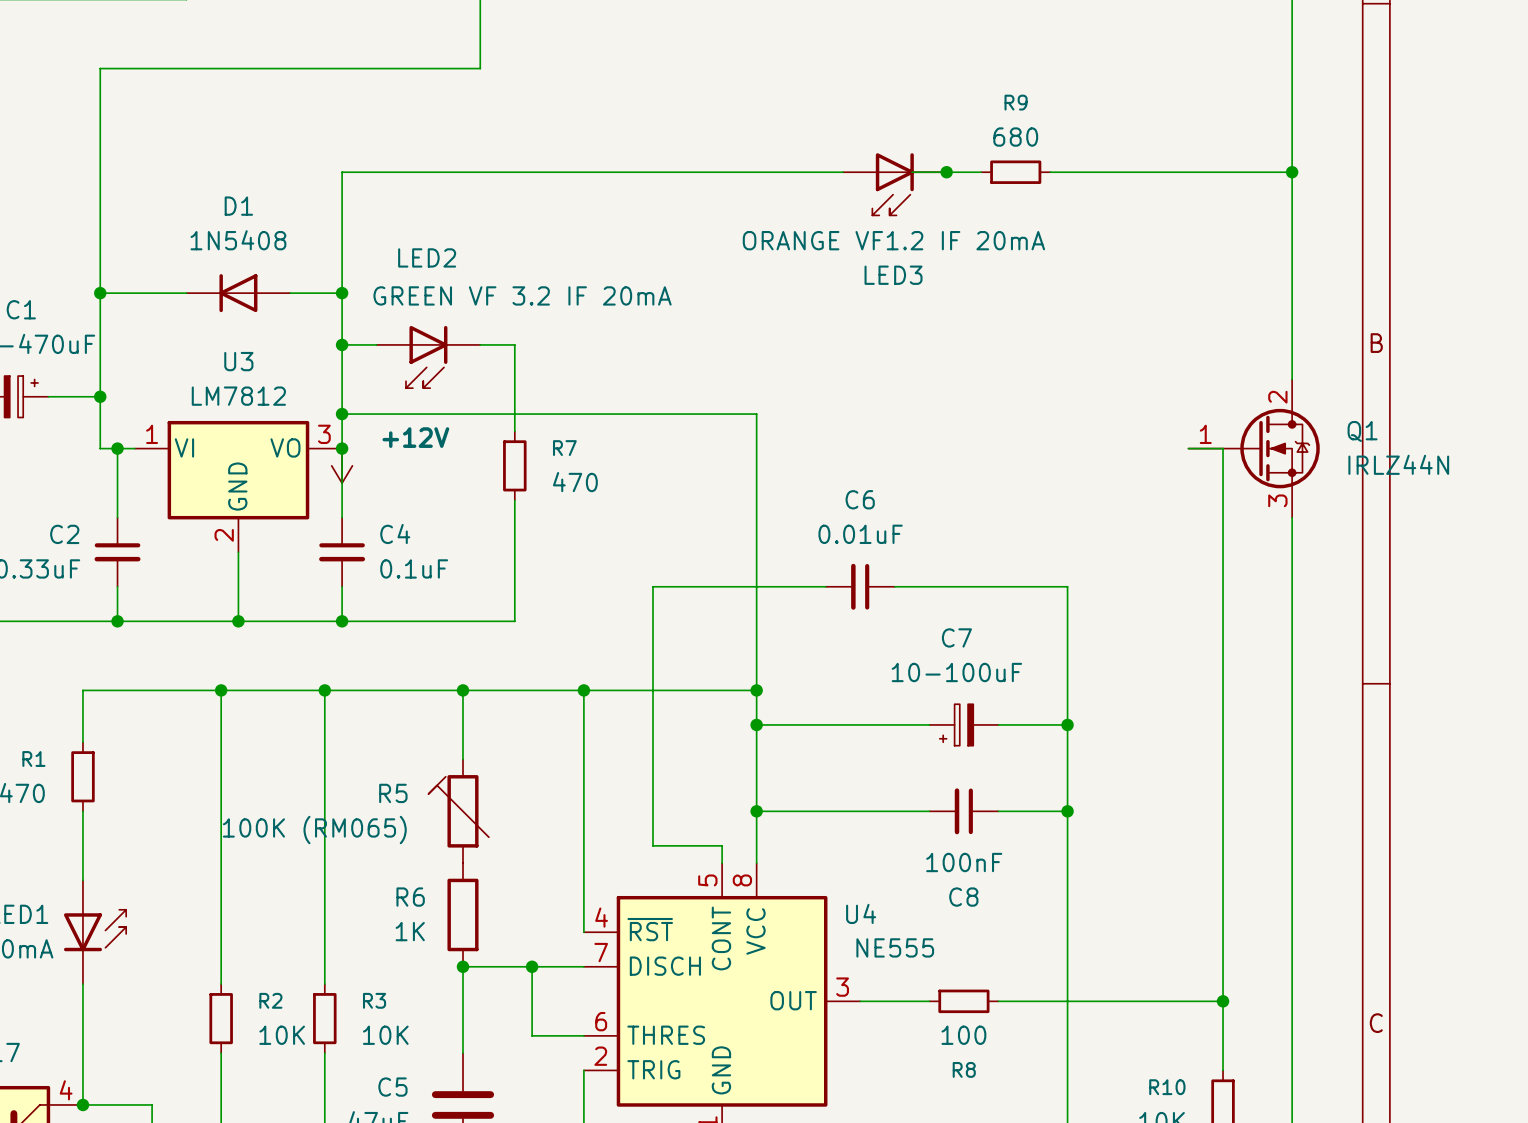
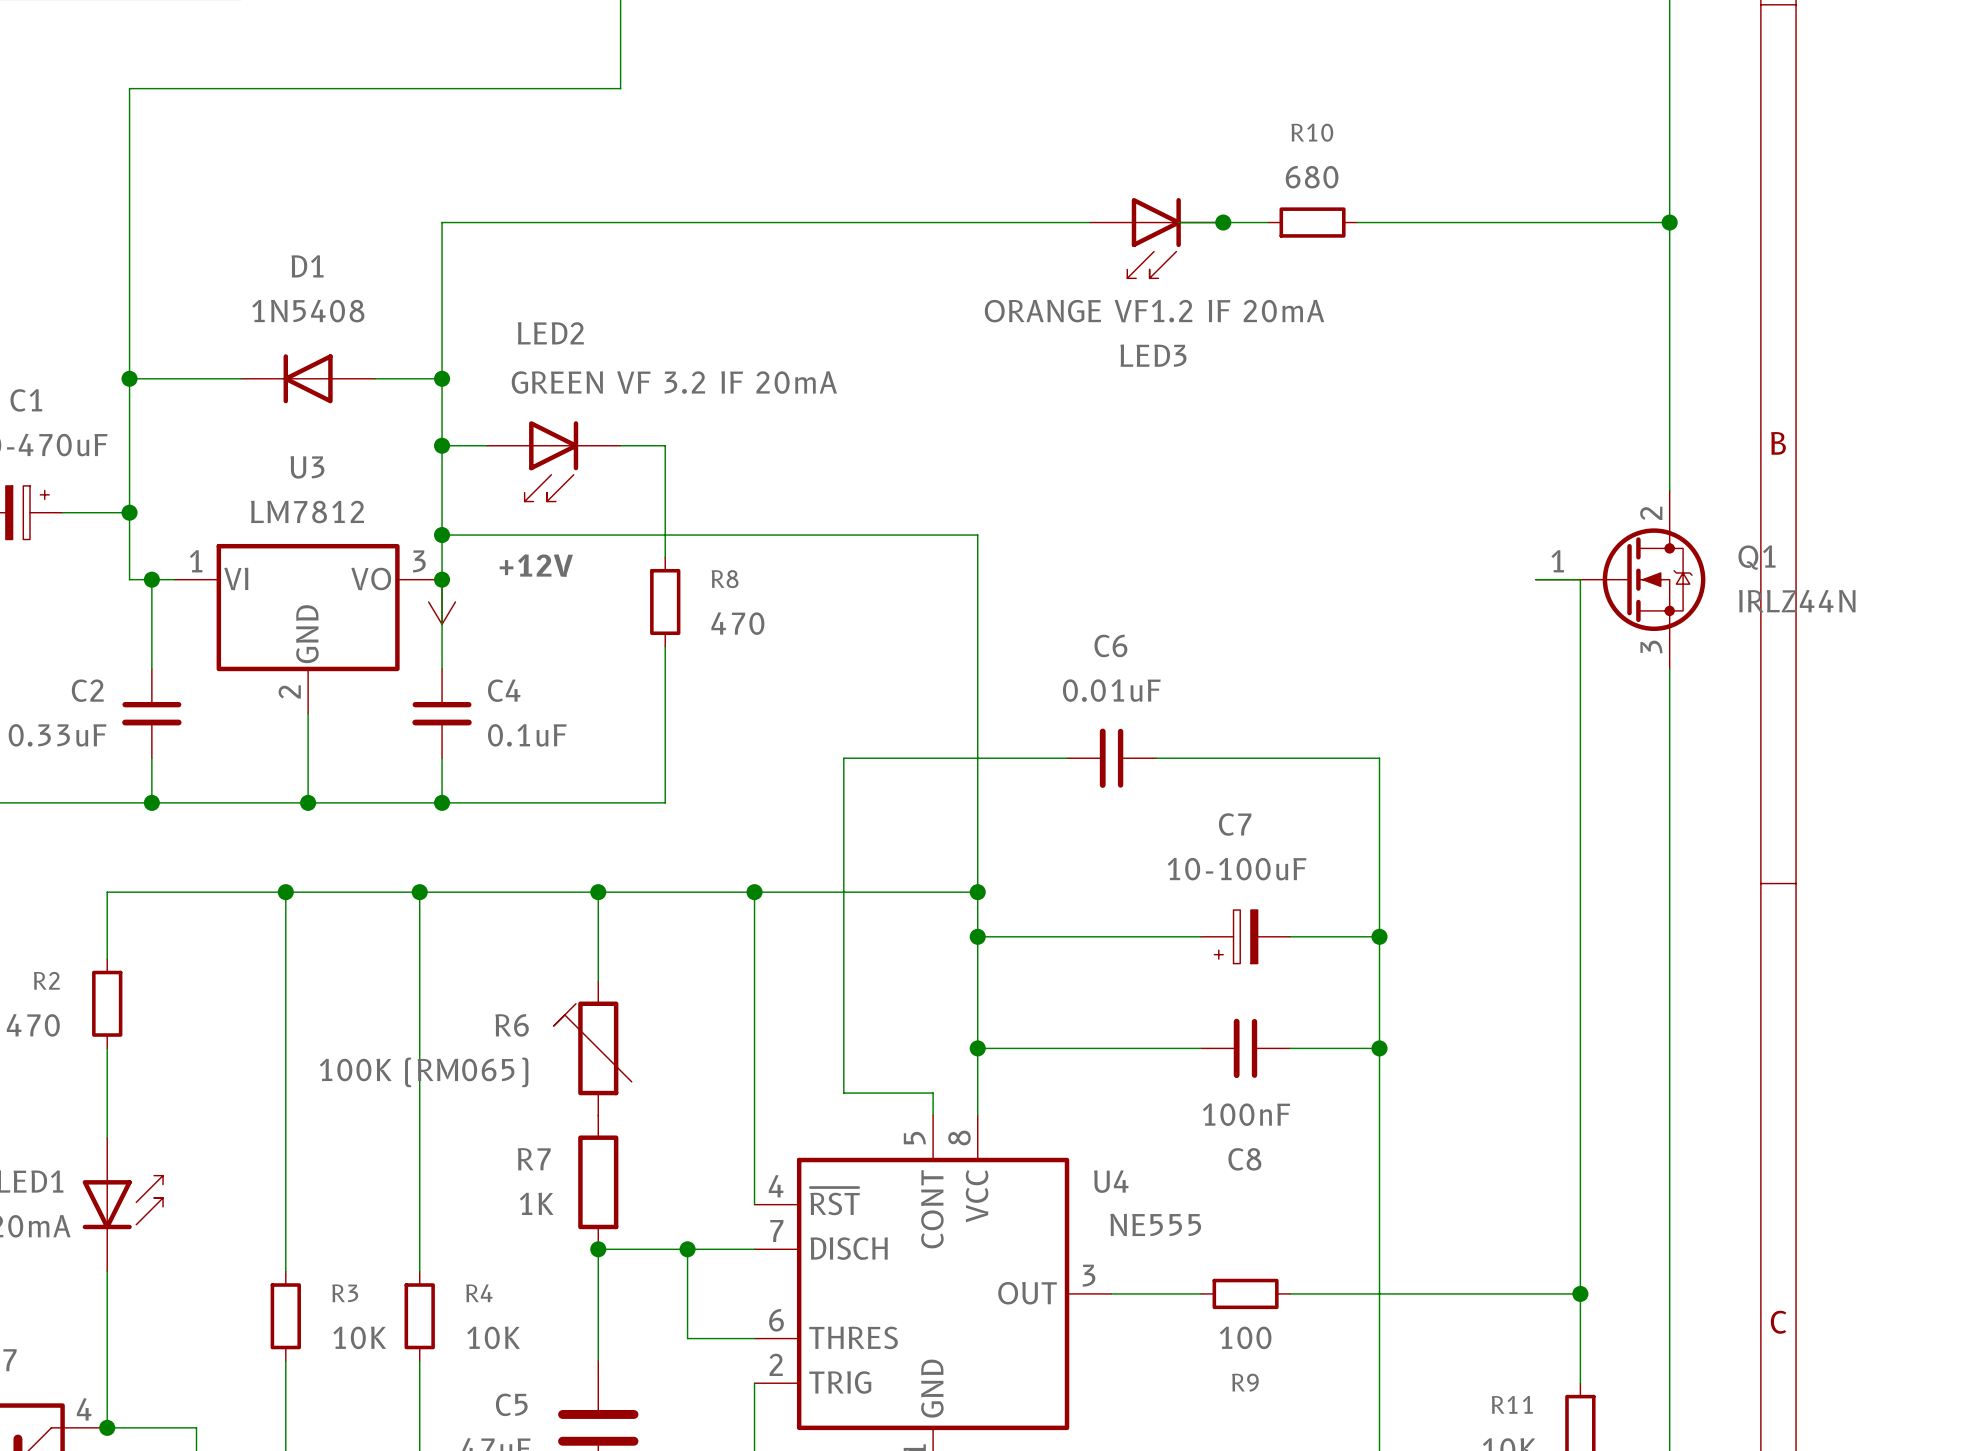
R9 name: R9 (1016, 102) -> R10 (1312, 132)
R7 name: R7 (564, 448) -> R8 (725, 579)
R1 name: R1 (33, 758) -> R2 (46, 980)
R5 name: R5 (393, 793) -> R6 (512, 1025)
R6 name: R6 (410, 897) -> R7 (534, 1159)
R2 name: R2 (270, 1000) -> R3 (345, 1293)
R3 name: R3 (374, 1000) -> R4 (479, 1293)
R8 name: R8 (964, 1069) -> R9 (1245, 1382)
R10 name: R10 (1167, 1087) -> R11 (1512, 1404)

